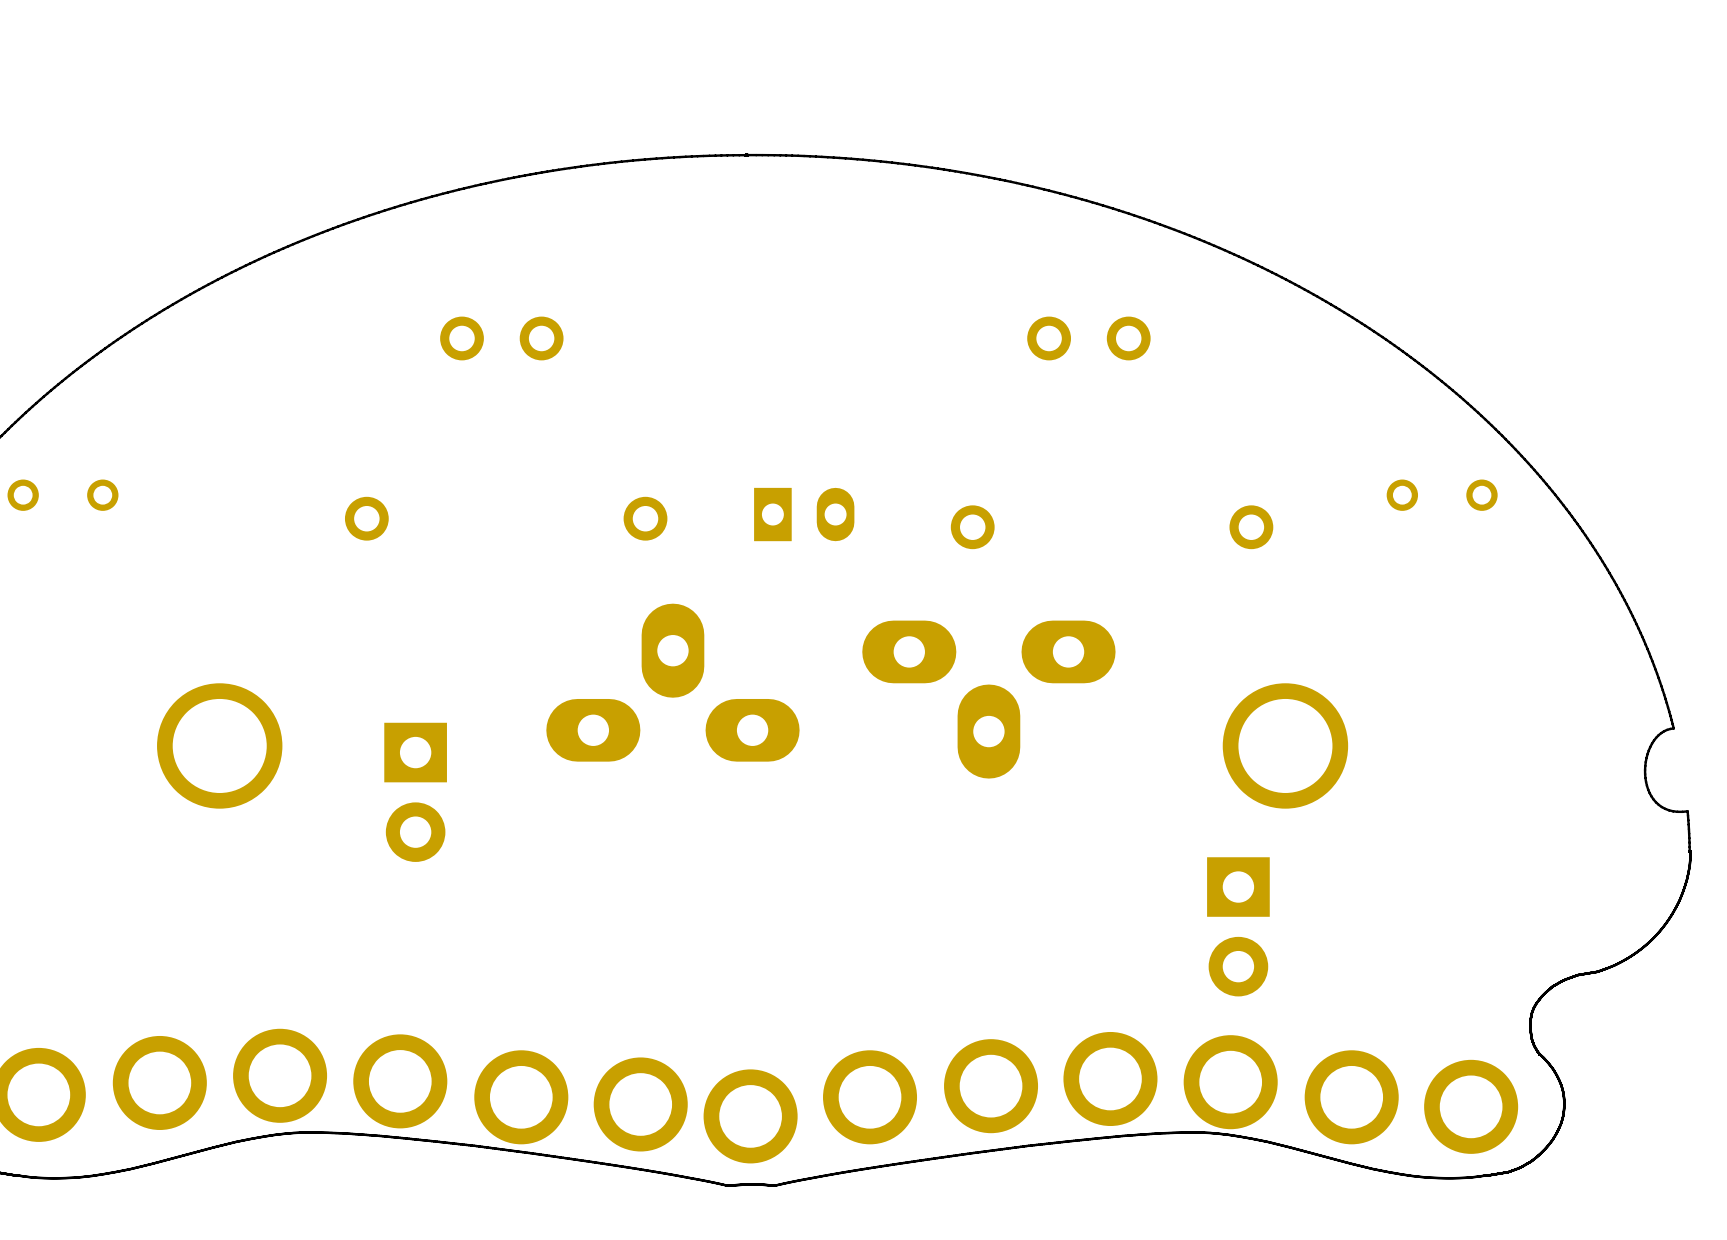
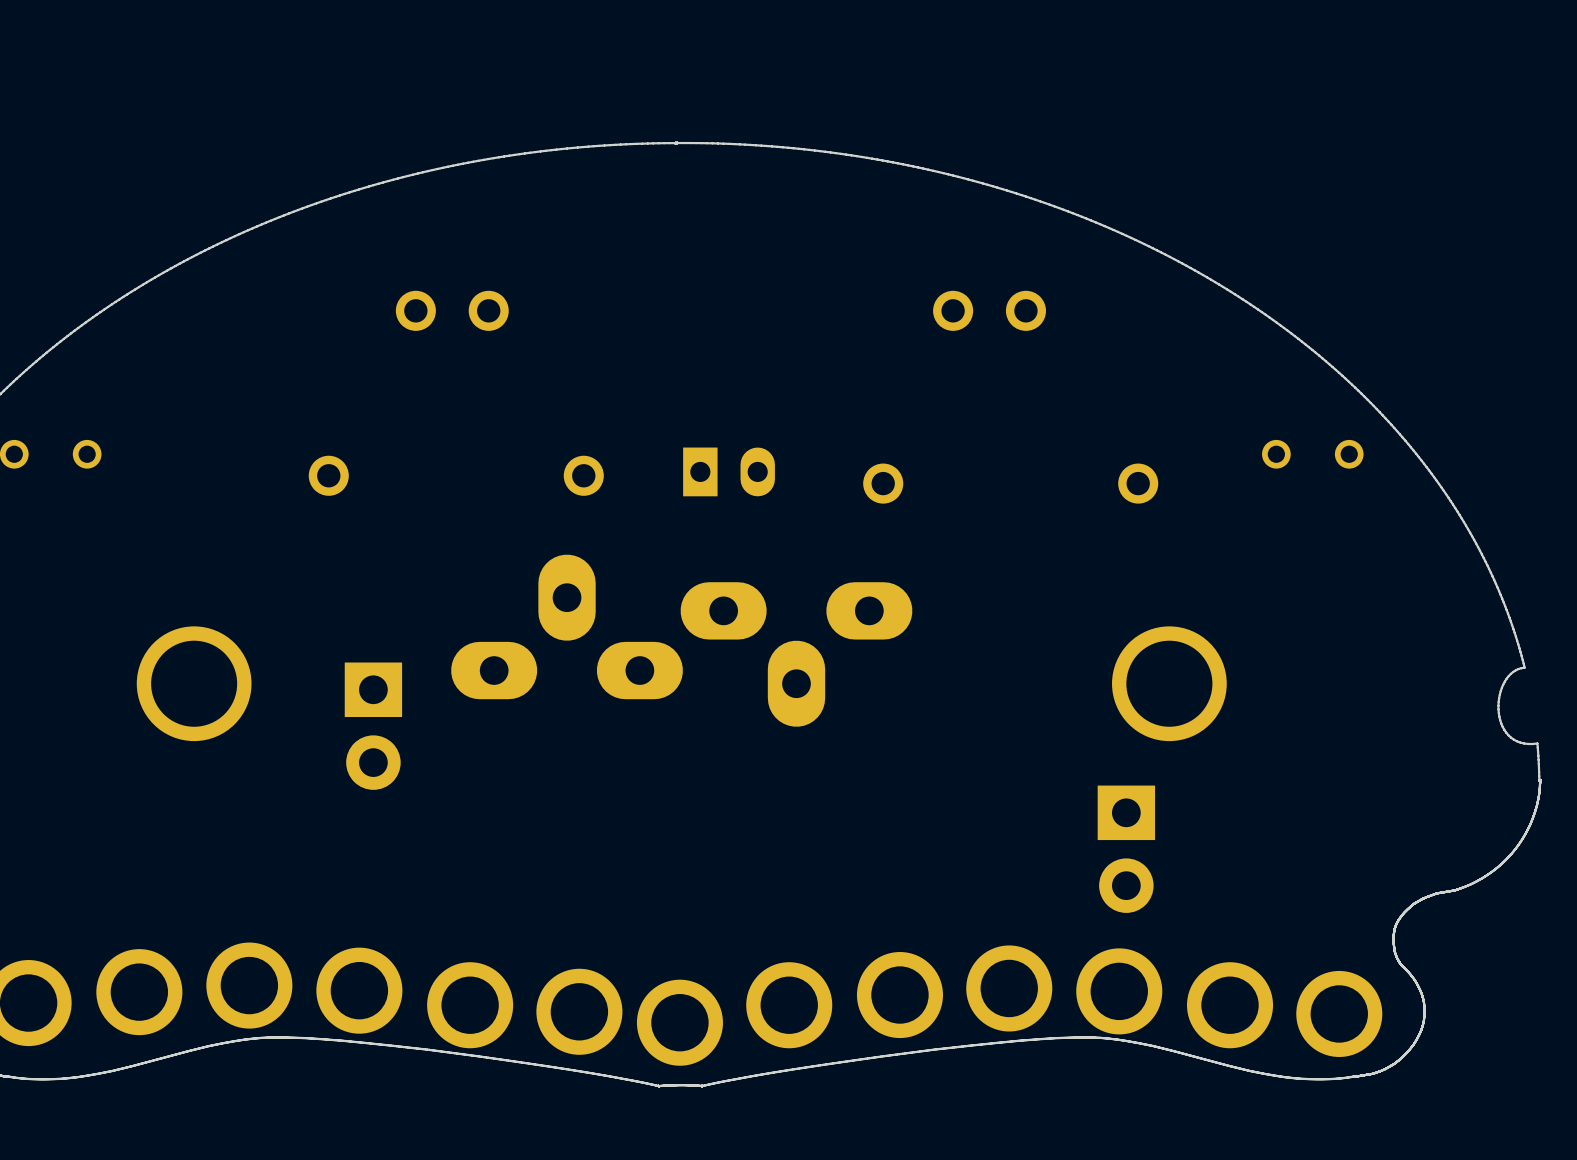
part position: (672, 682) -> (567, 626)
part: (988, 699) -> none
part: none -> (796, 654)

